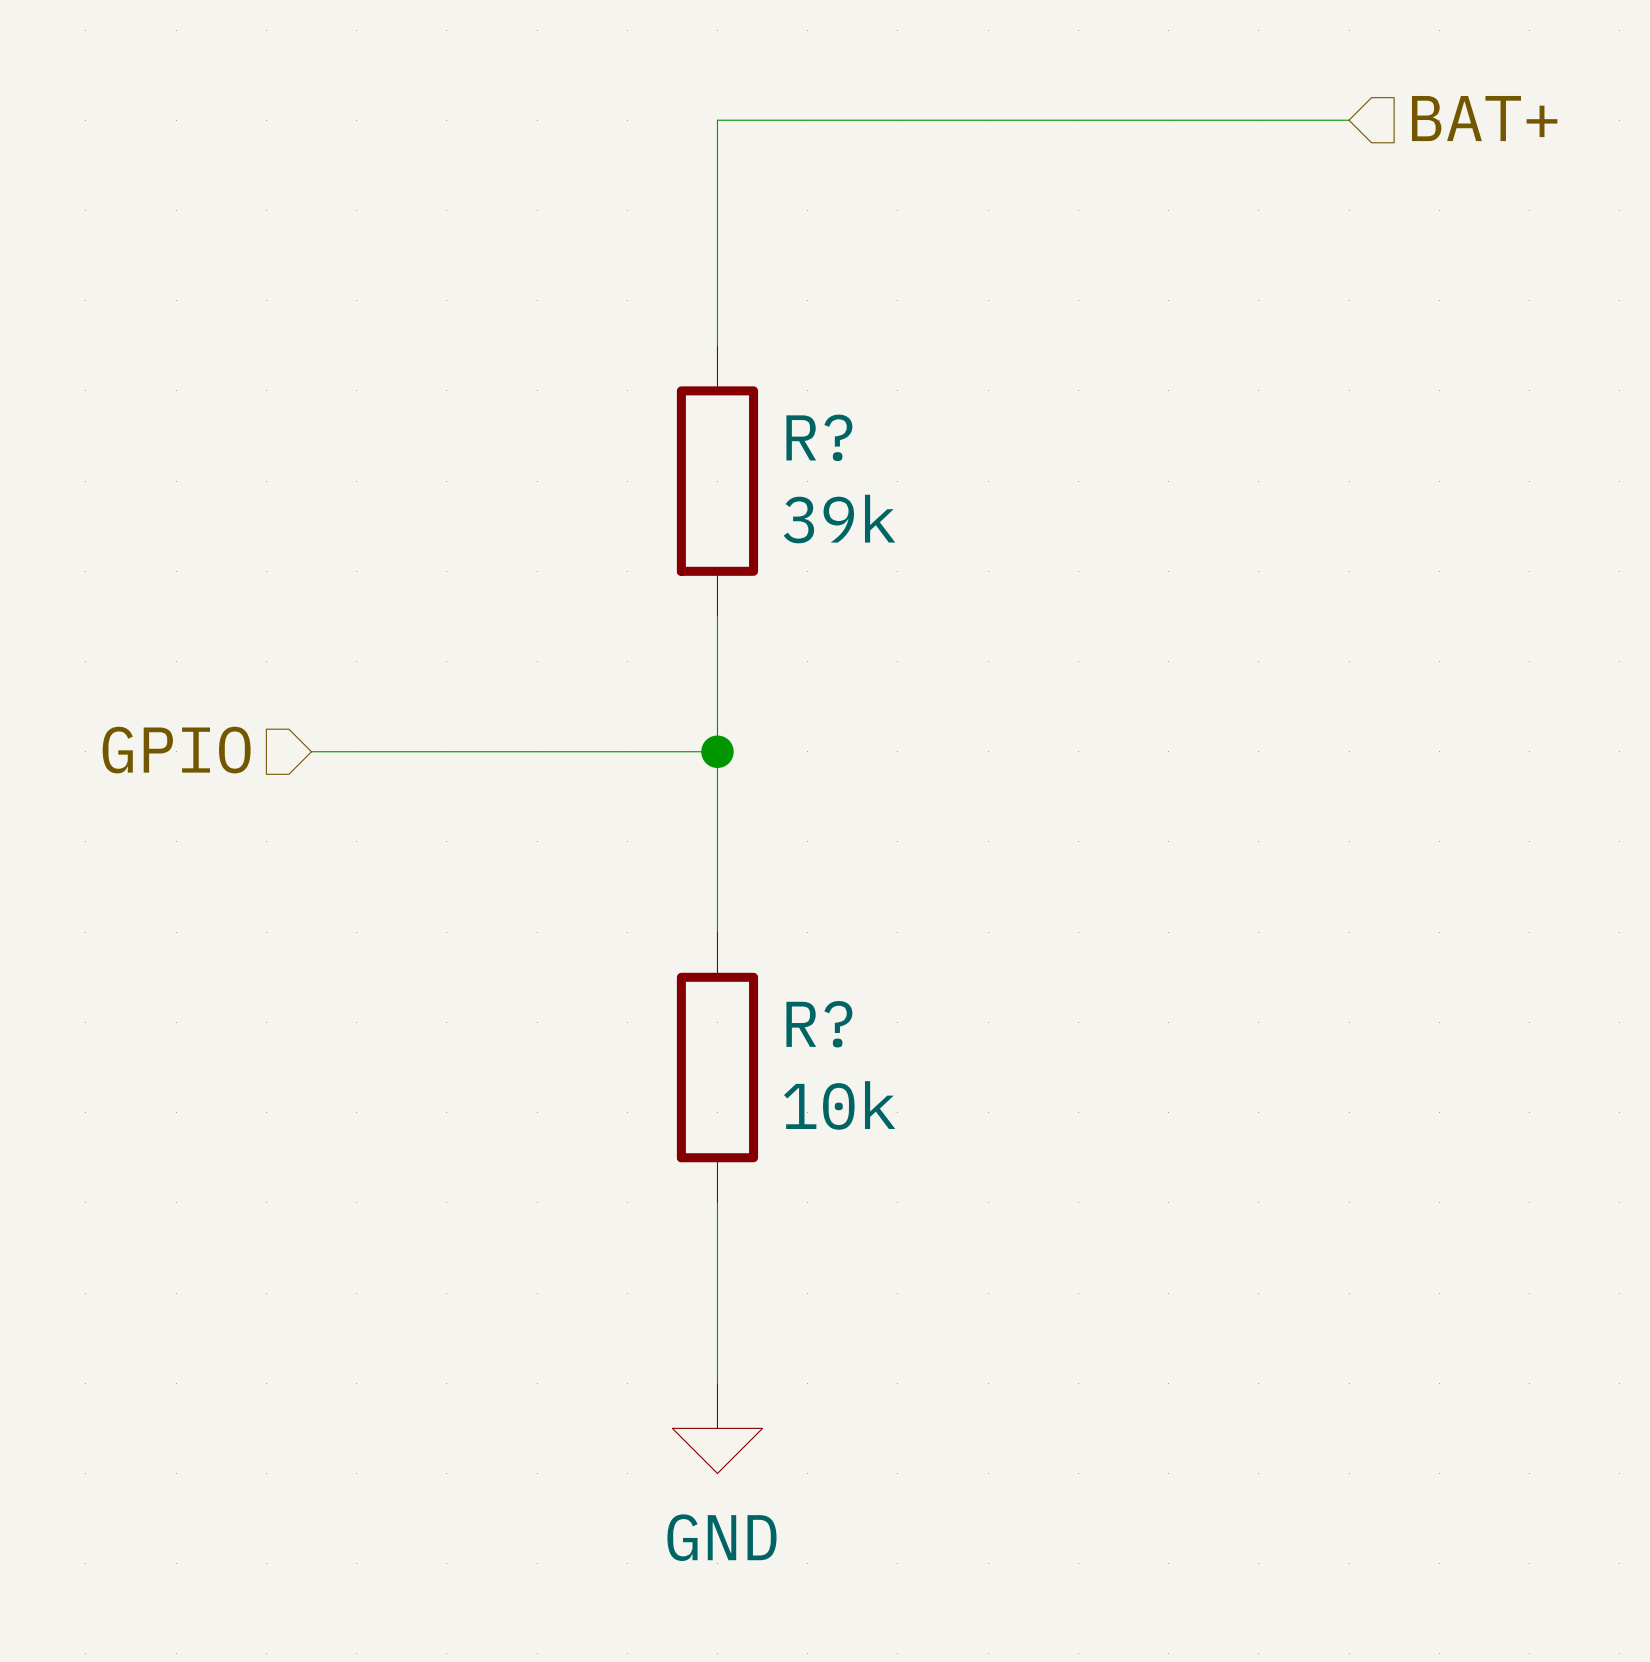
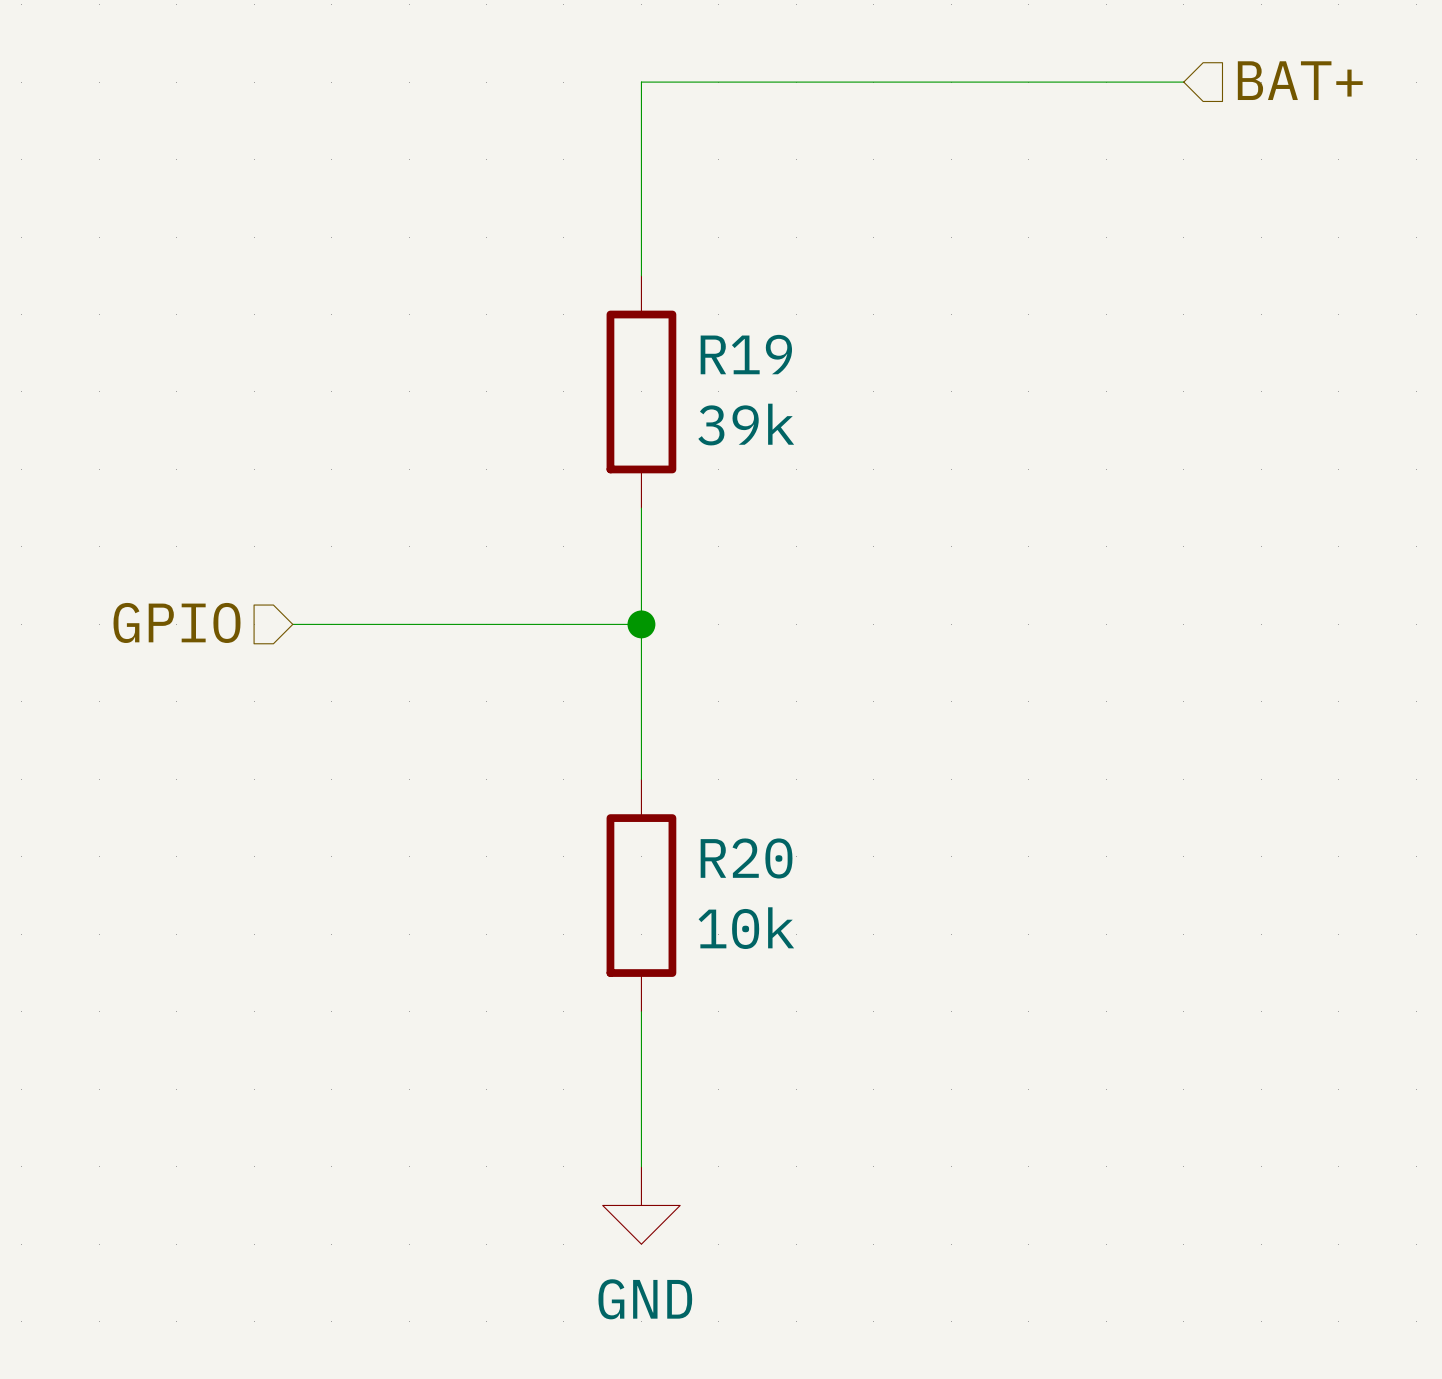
R? name: R? (819, 437) -> R19 (746, 354)
R? name: R? (819, 1024) -> R20 (746, 858)

